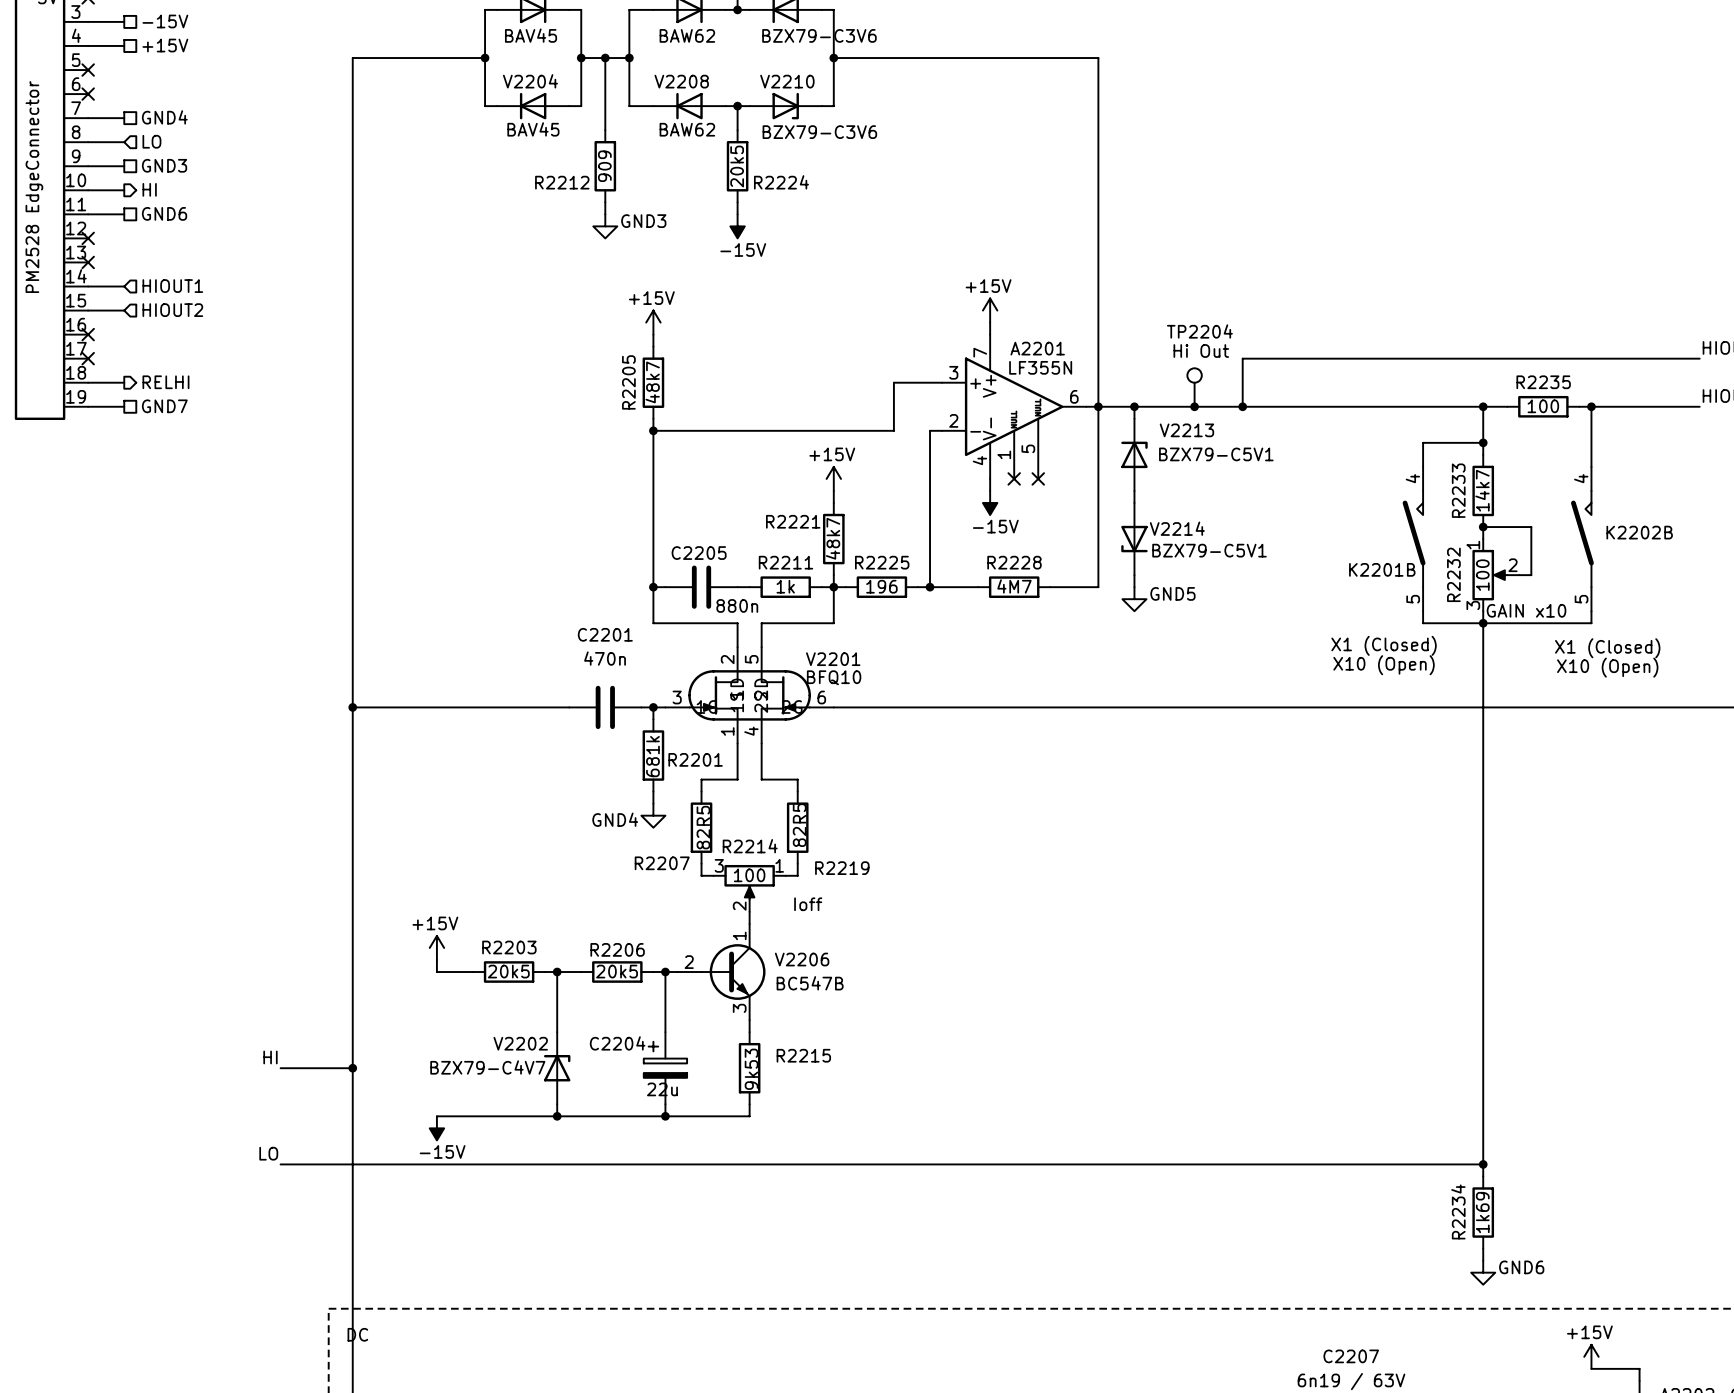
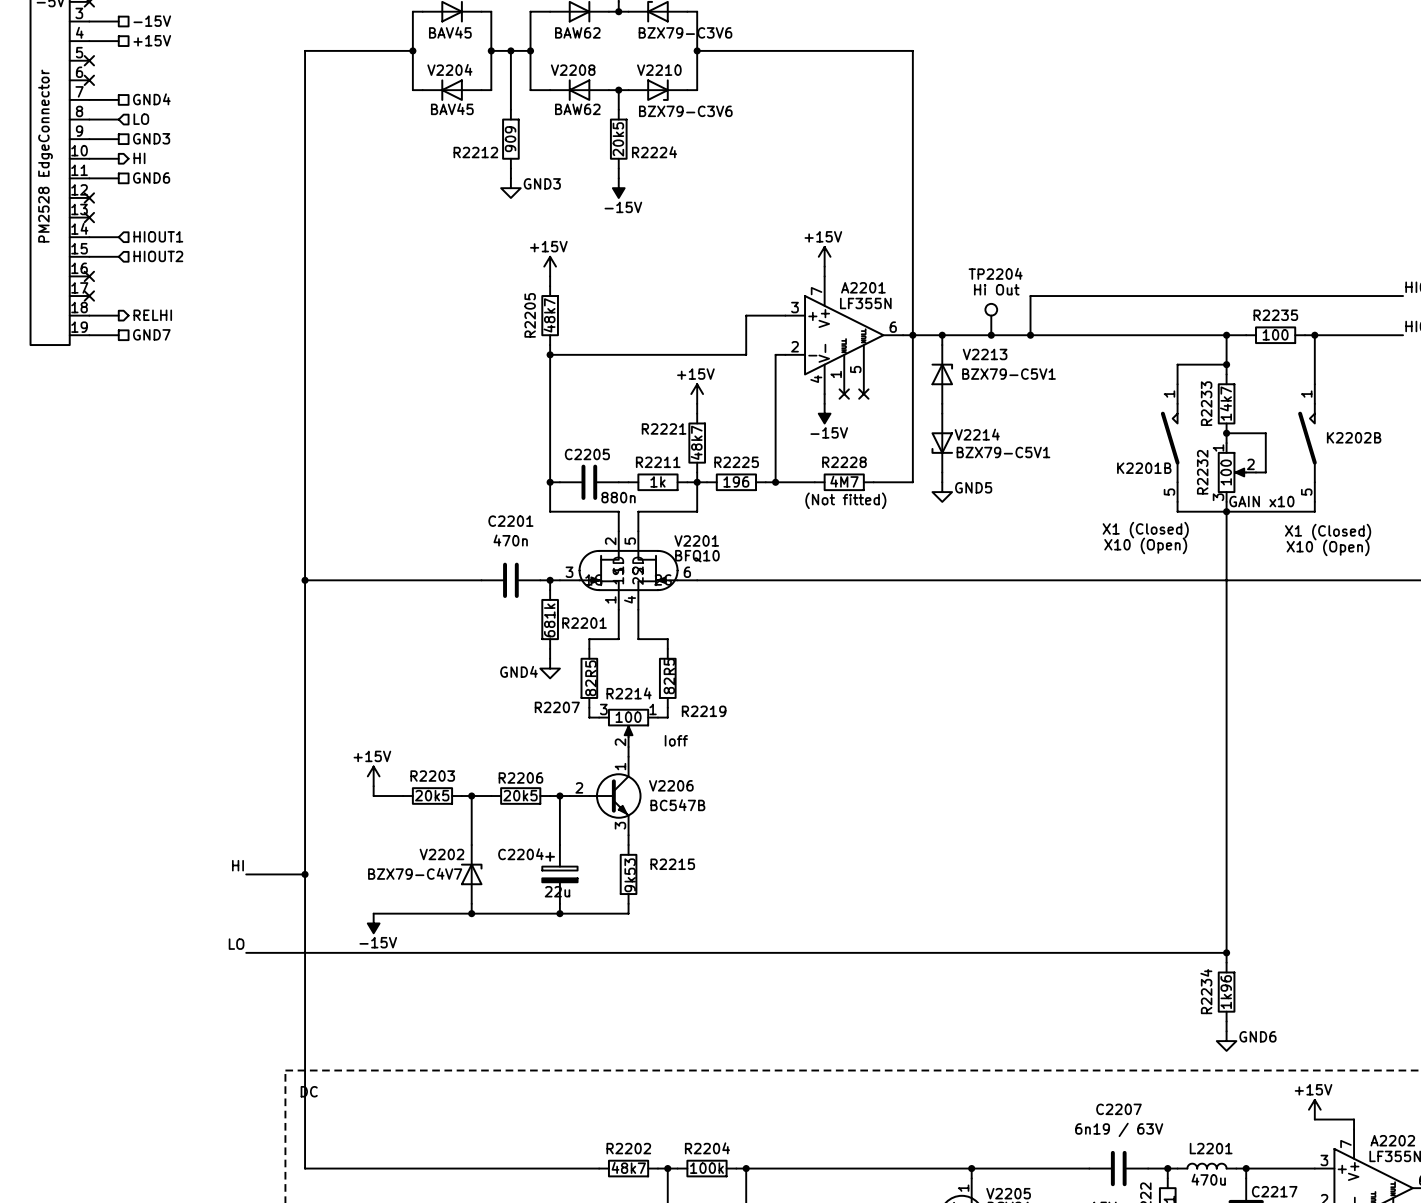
K2201B pin number: 4 (1412, 478) -> 1 (1169, 394)
K2202B pin number: 4 (1581, 478) -> 1 (1306, 394)
text: none -> (Not fitted) (845, 500)
R2234 value: 1k69 (1482, 1212) -> 1k96 (1226, 992)

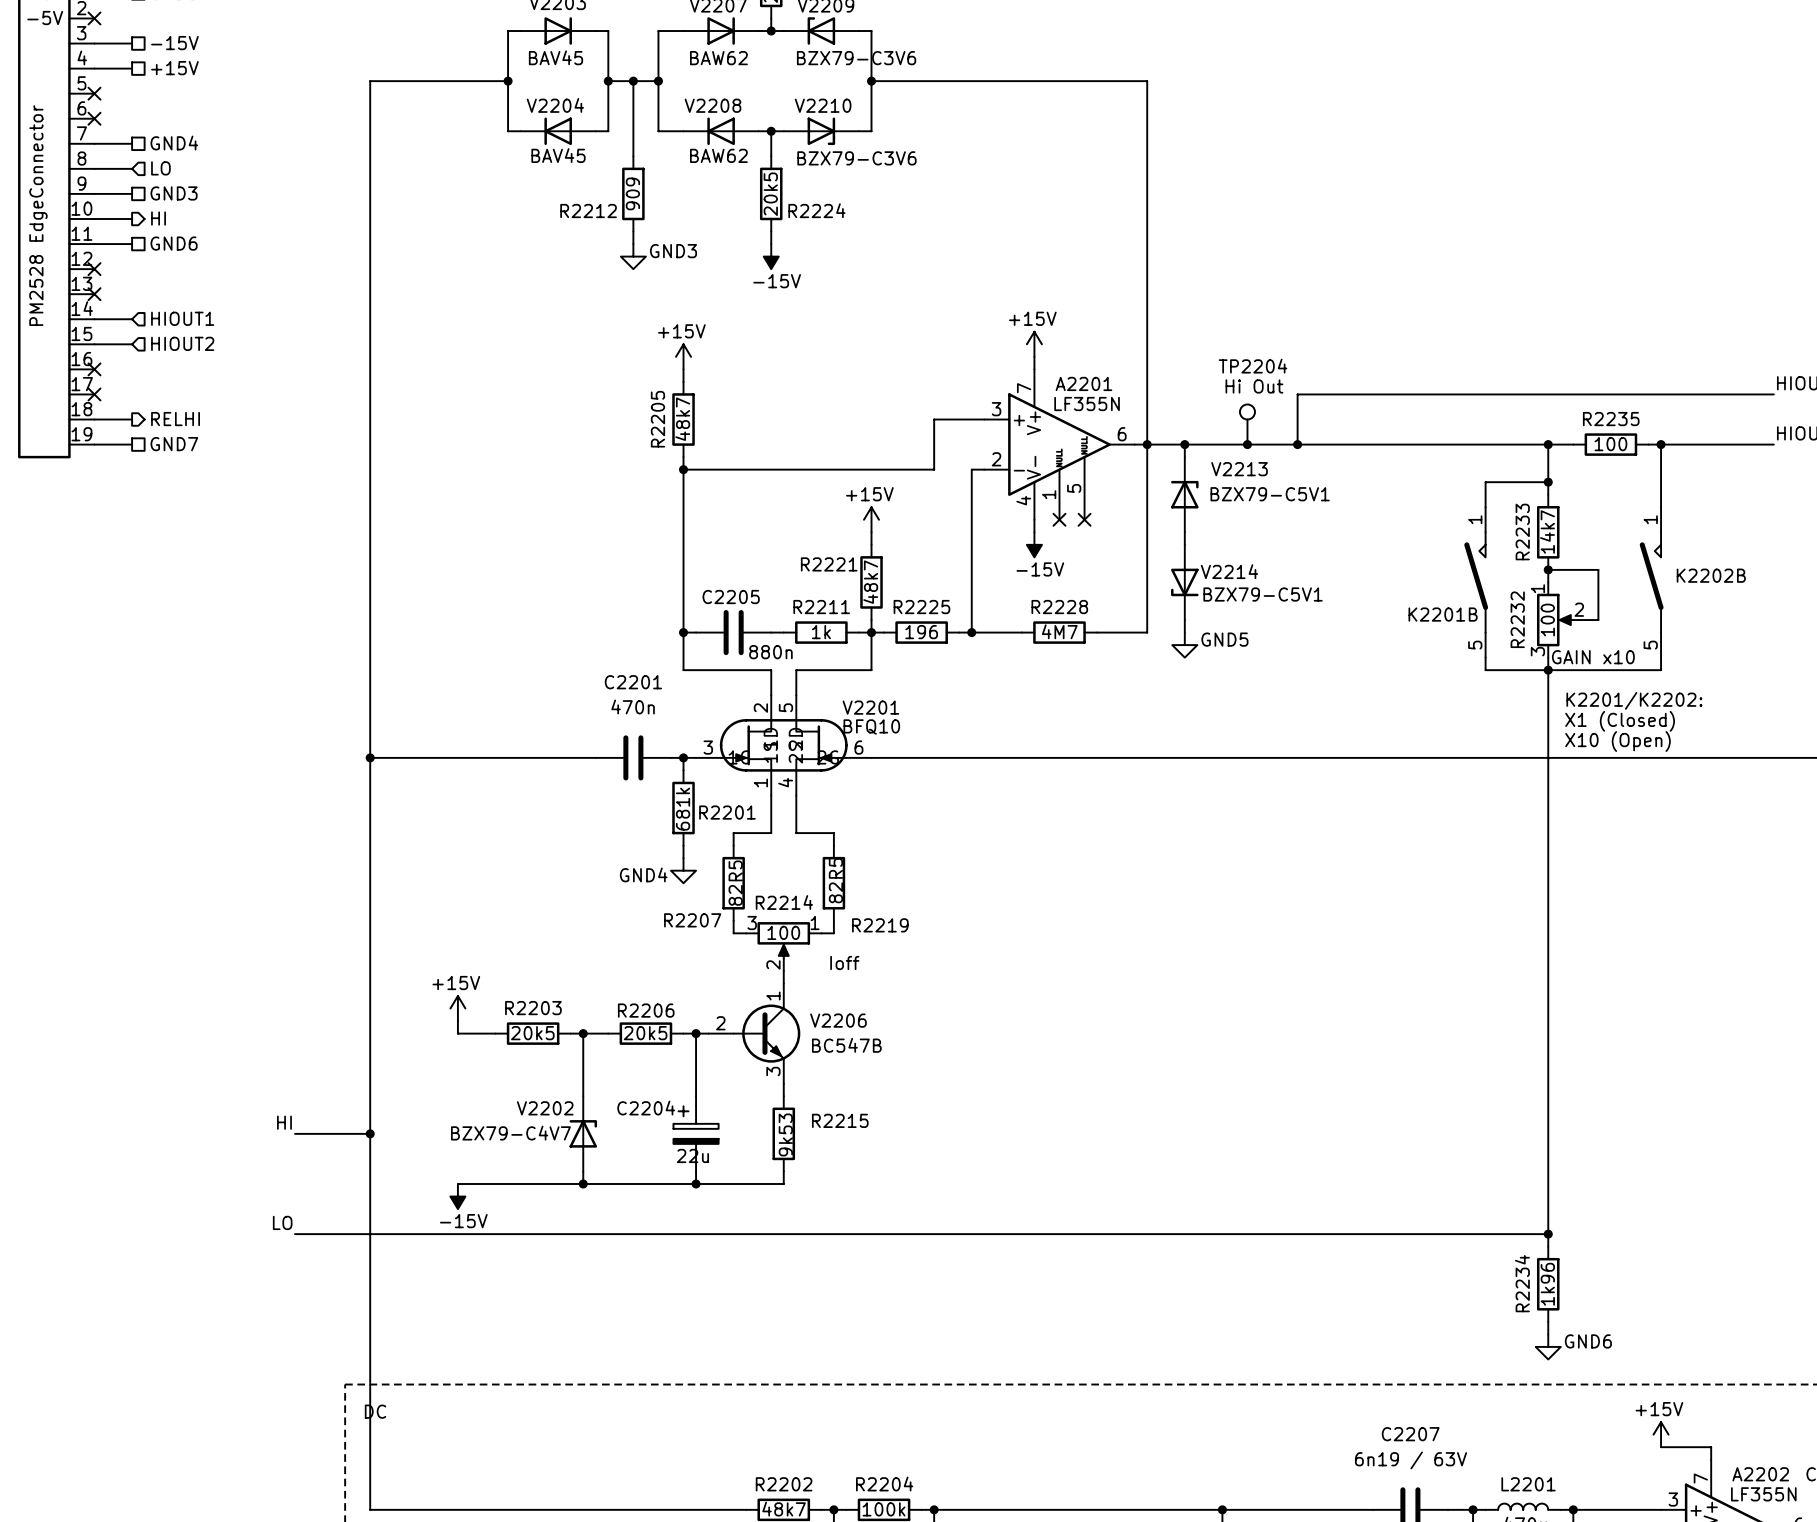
text: (Not fitted) (845, 500) -> none
text: X1 (Closed) (1145, 530) -> none
text position: X1 (Closed) (1328, 532) -> X1 (Closed) (1620, 721)
text: none -> K2201/K2202: (1634, 700)
text: X10 (Open) (1145, 545) -> none
text position: X10 (Open) (1328, 547) -> X10 (Open) (1618, 741)

